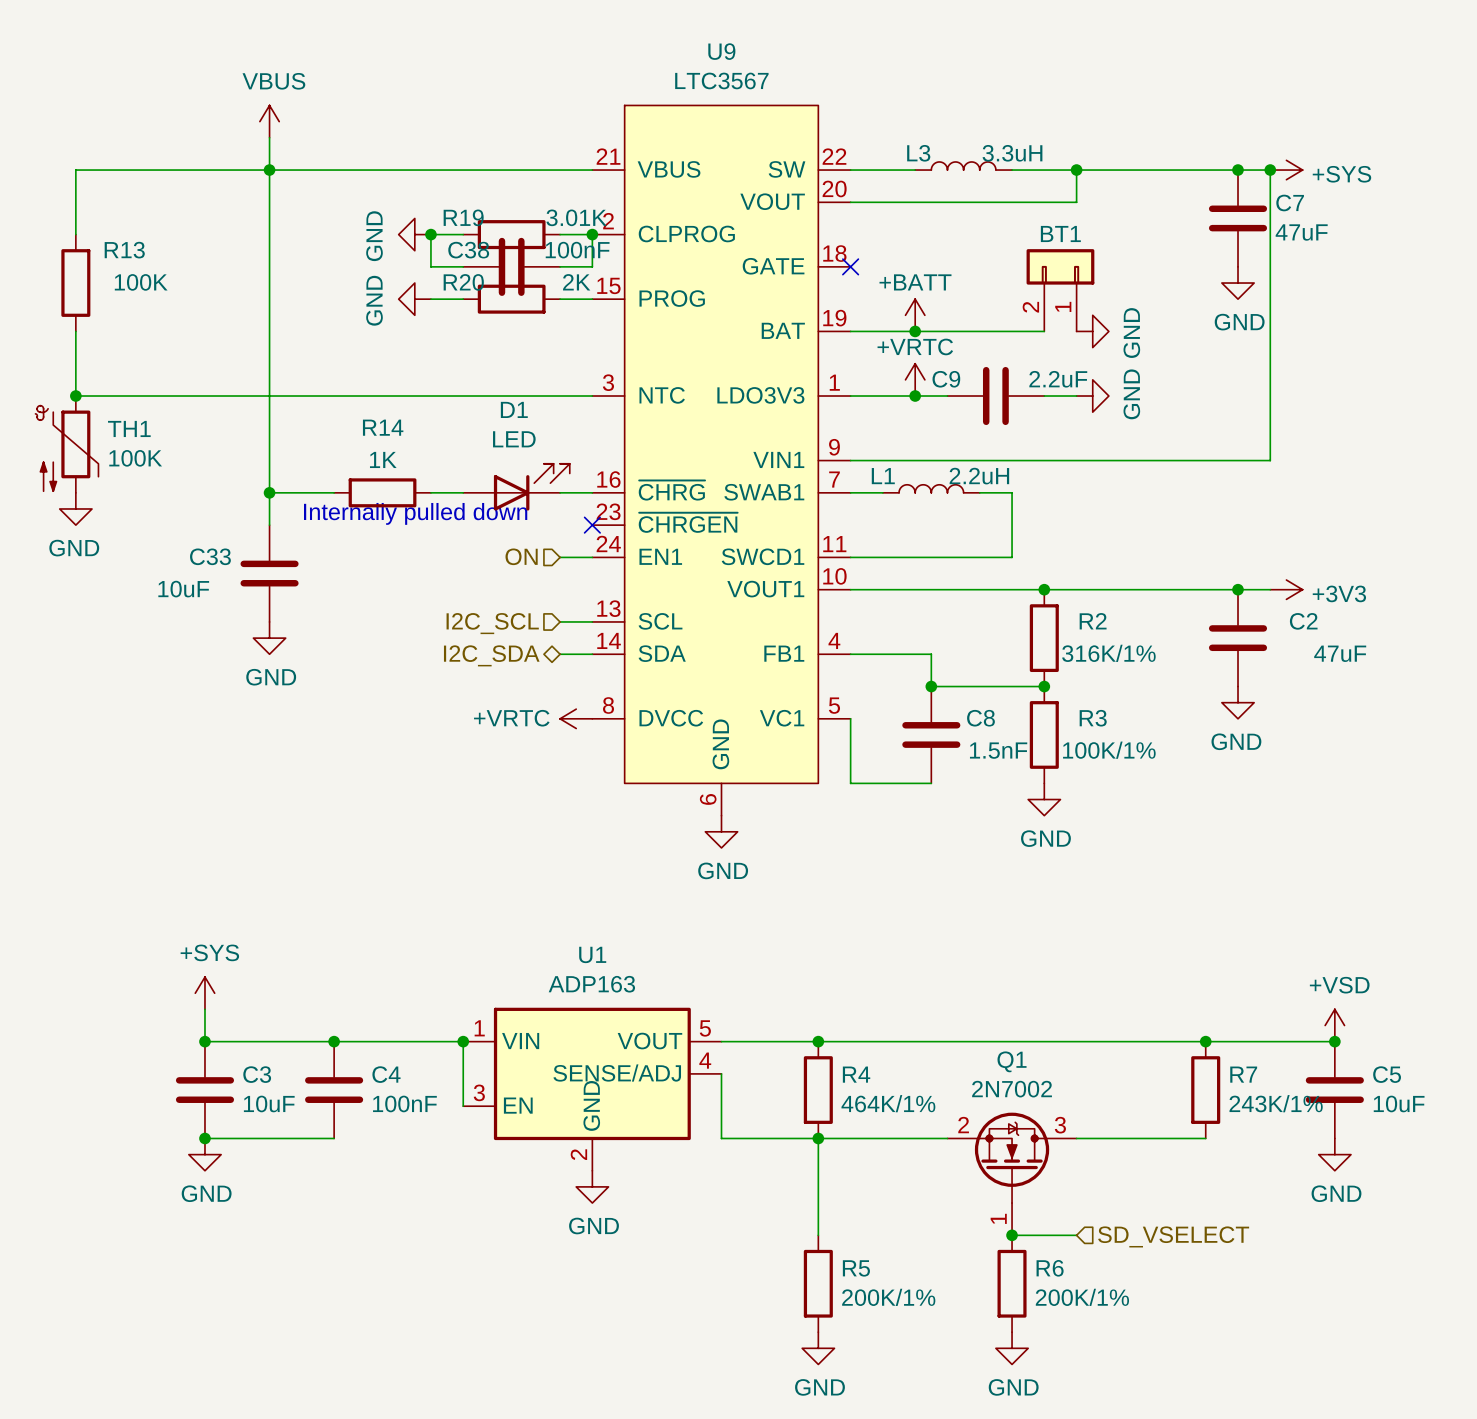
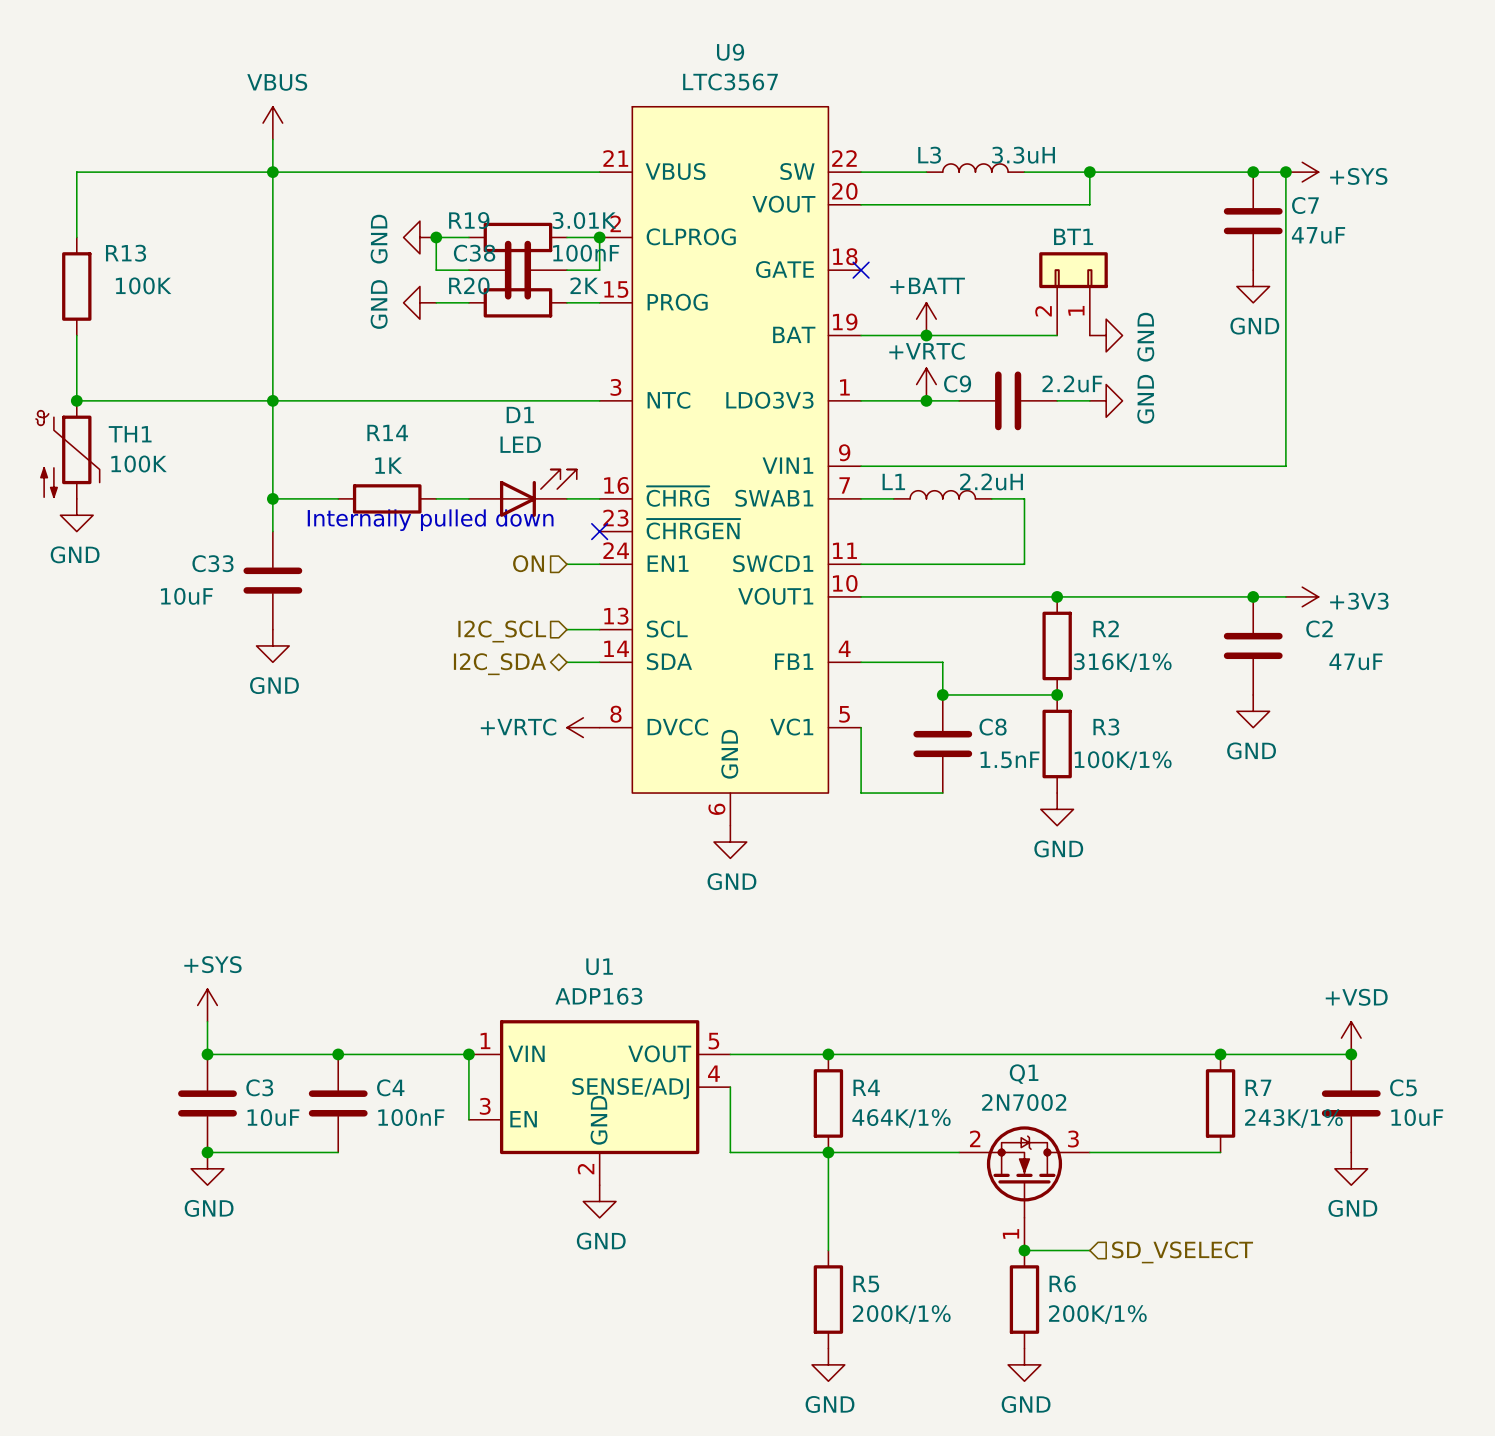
junction: none -> (272, 400)

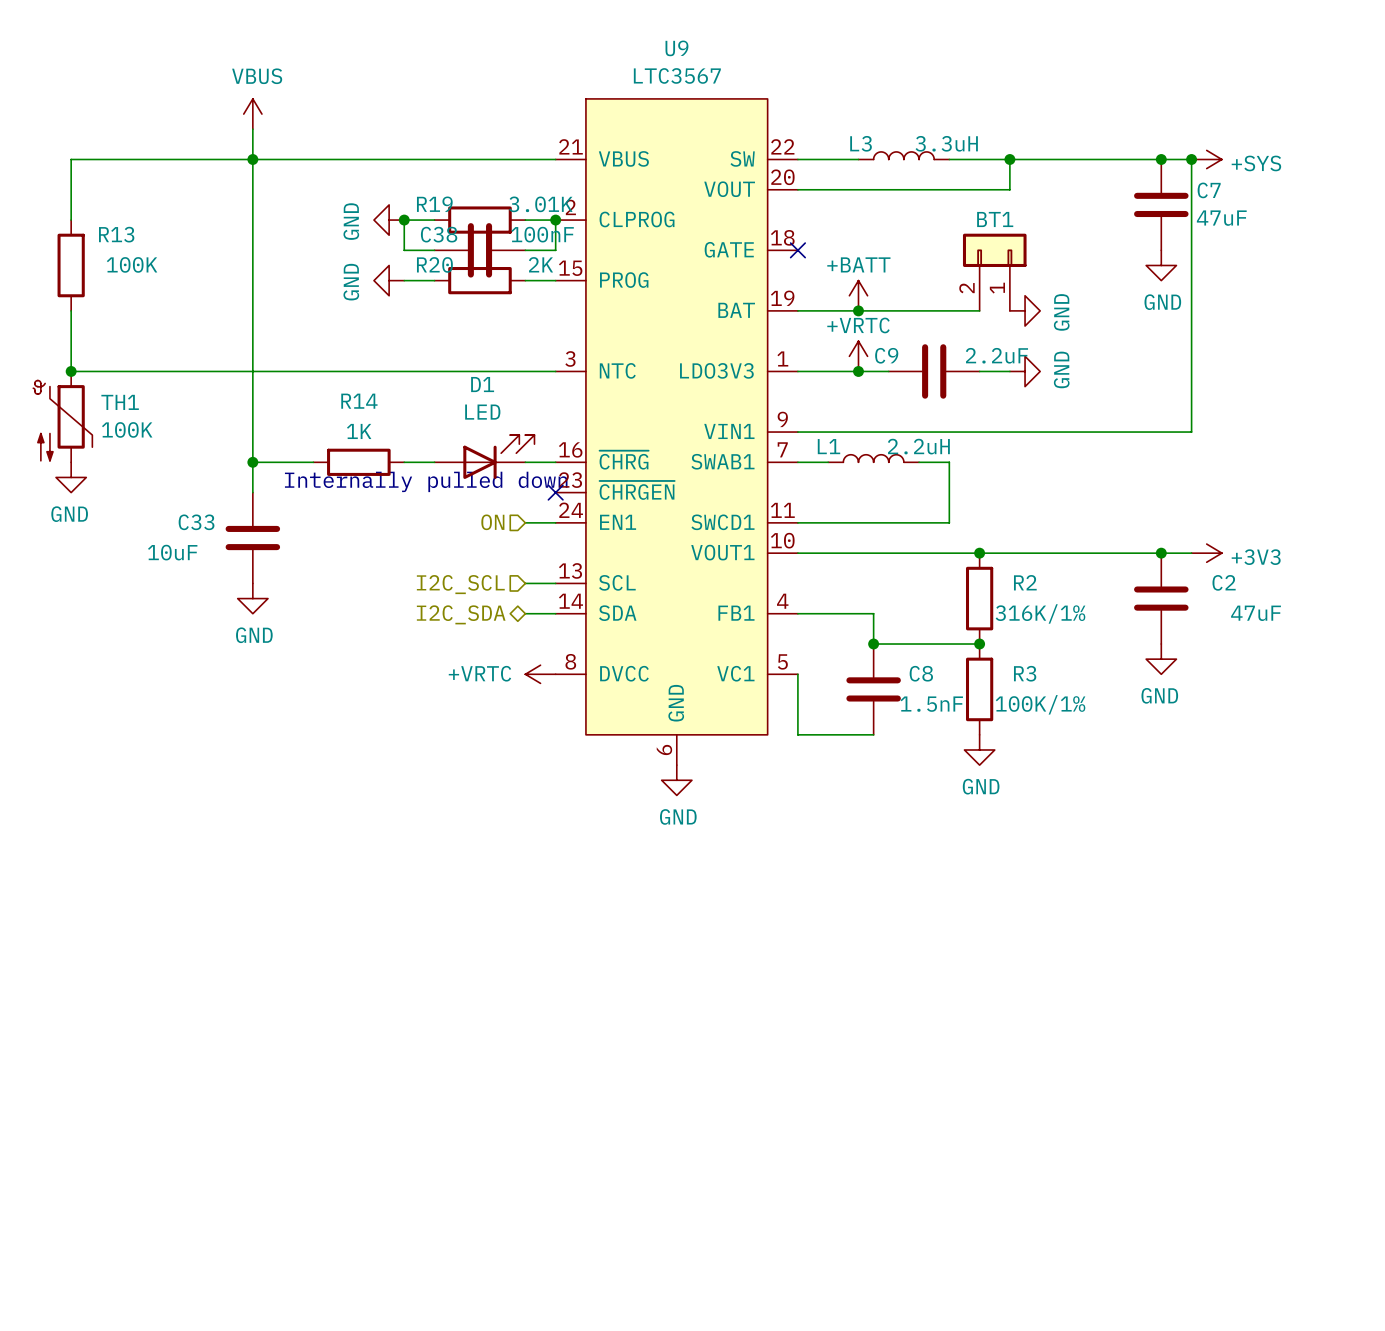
junction: (272, 400) -> none
power symbol: +SYS (207, 1005) -> none
wire: (207, 1021) (207, 1054) (468, 1054) (468, 1119) -> none
power symbol: +VSD (1351, 1038) -> none
junction: (207, 1054) -> none
junction: (338, 1054) -> none
junction: (468, 1054) -> none
wire: (730, 1054) (1351, 1054) -> none
junction: (828, 1054) -> none
junction: (1220, 1054) -> none
junction: (1351, 1054) -> none
wire: (730, 1087) (730, 1152) (959, 1152) -> none
U1: ADP163 (599, 1102) -> none
C3: 10uF (207, 1103) -> none
C4: 100nF (338, 1103) -> none
R4: 464K/1% (828, 1103) -> none
R7: 243K/1% (1220, 1103) -> none
C5: 10uF (1351, 1103) -> none
wire: (207, 1152) (338, 1152) -> none
junction: (207, 1152) -> none
wire: (828, 1152) (828, 1250) -> none
junction: (828, 1152) -> none
wire: (1089, 1152) (1220, 1152) -> none
power symbol: GND (207, 1168) -> none
power symbol: GND (1351, 1168) -> none
Q1: 2N7002 (1024, 1188) -> none
power symbol: GND (599, 1201) -> none
wire: (1024, 1250) (1089, 1250) -> none
junction: (1024, 1250) -> none
hierarchical label: SD_VSELECT (1182, 1252) -> none
R5: 200K/1% (828, 1299) -> none
R6: 200K/1% (1024, 1299) -> none
power symbol: GND (828, 1364) -> none
power symbol: GND (1024, 1364) -> none

